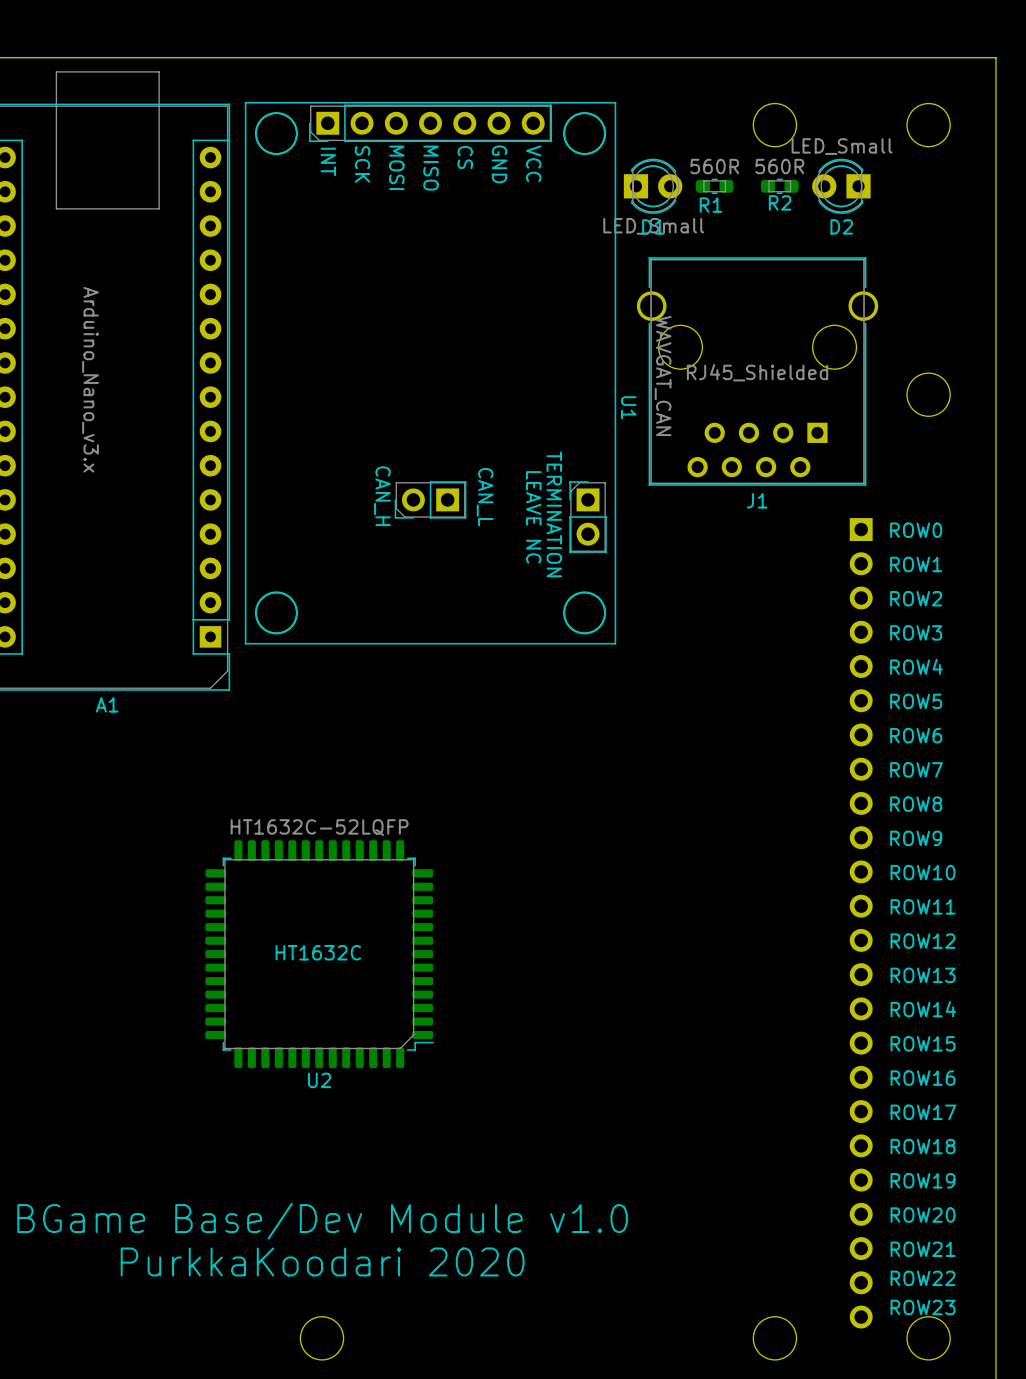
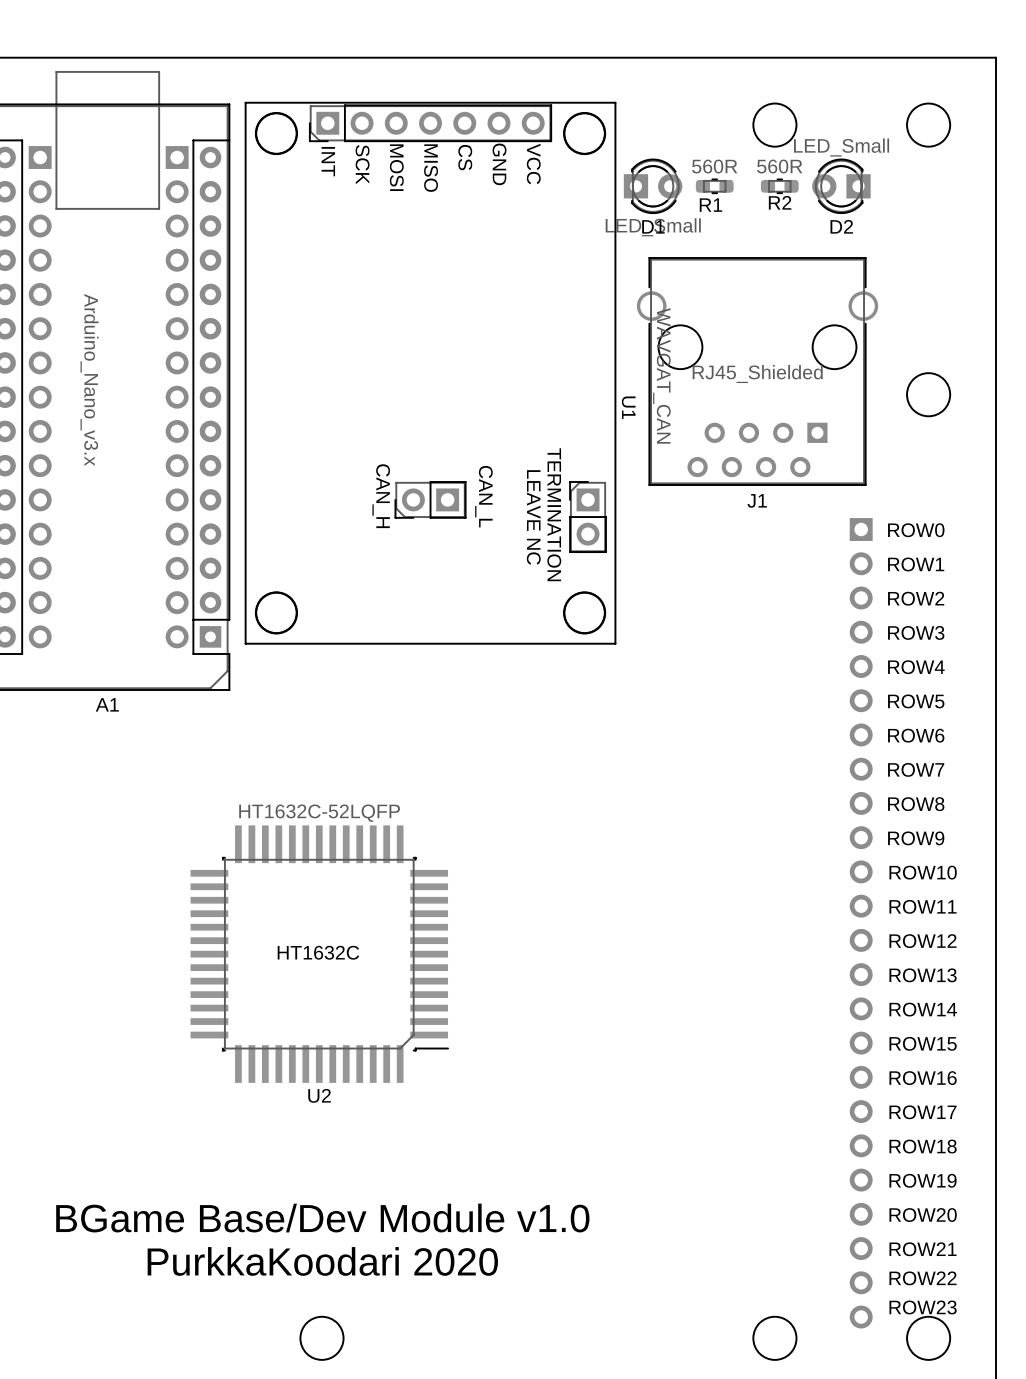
part: none -> (40, 397)
part: none -> (177, 397)
U2 footprint: [205, 840, 435, 1069] -> [190, 825, 449, 1083]

